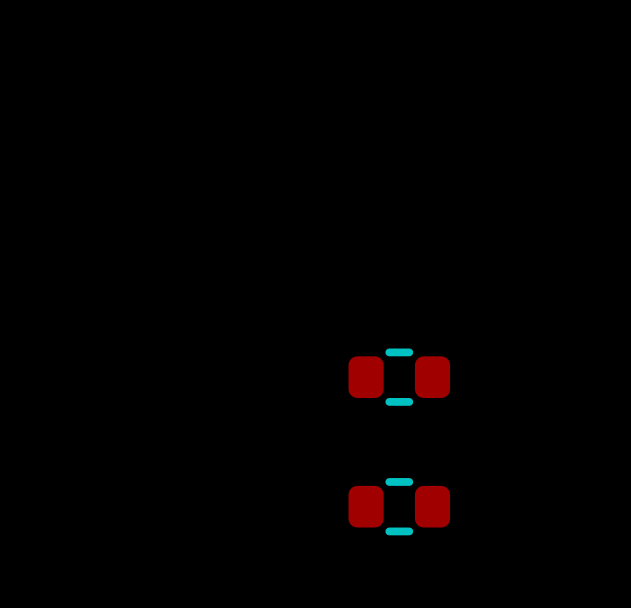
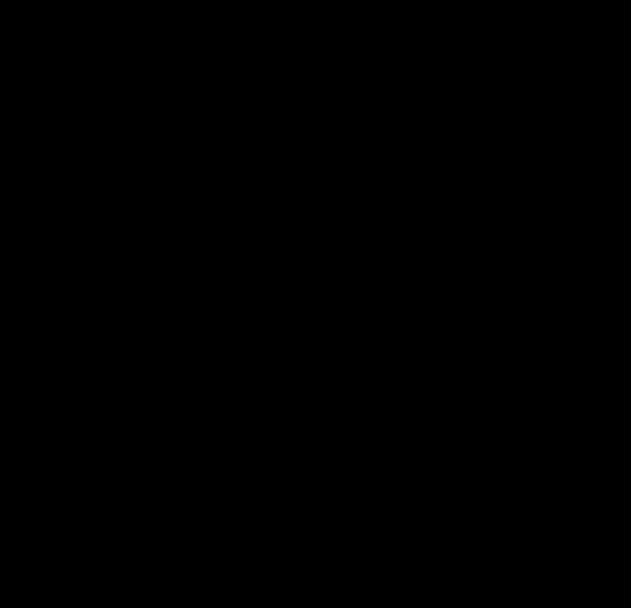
part: (399, 377) -> none
part: (399, 506) -> none

